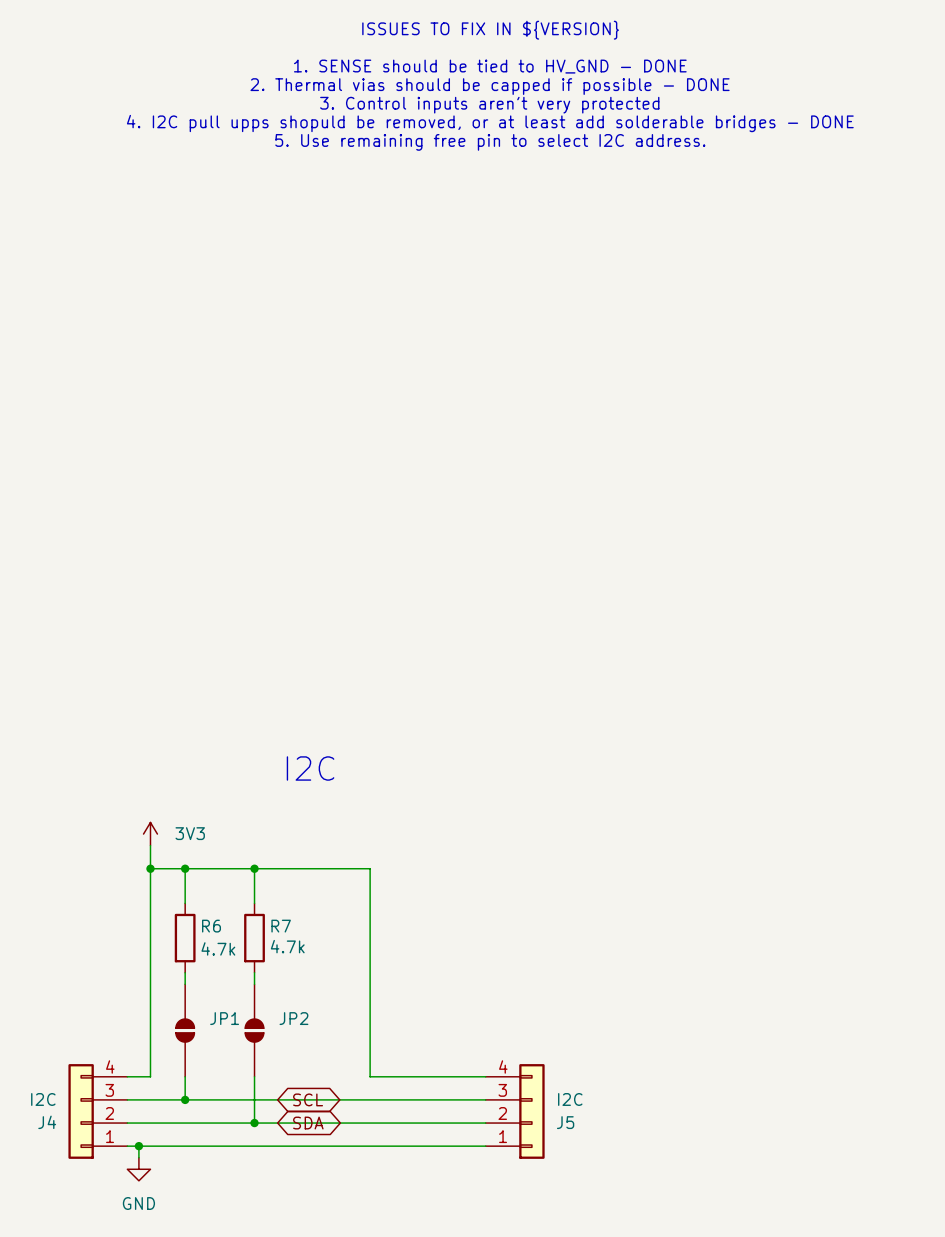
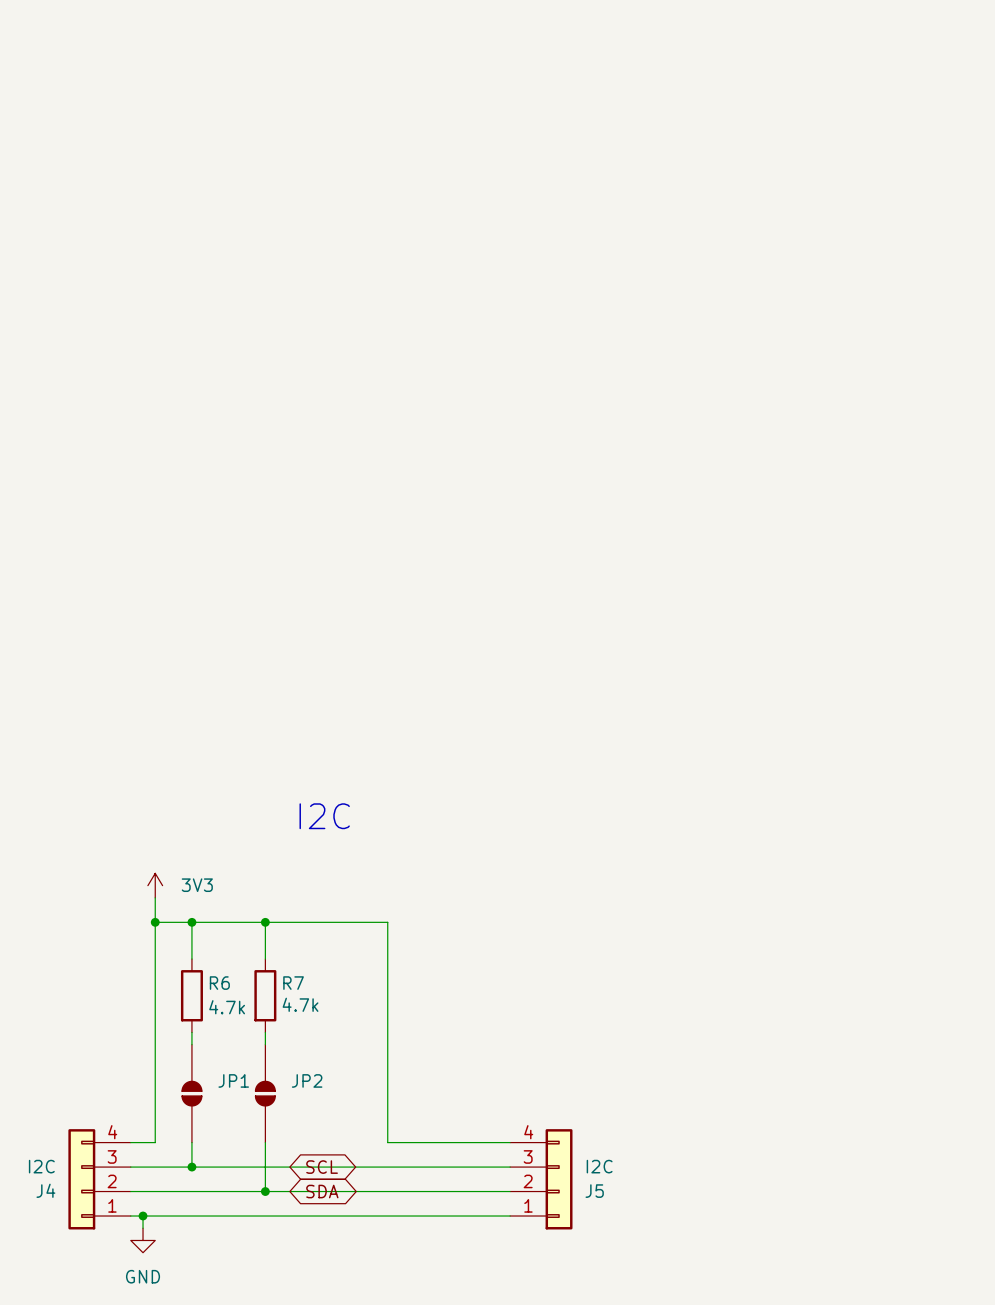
text: ISSUES TO FIX IN ${VERSION} (490, 30) -> none
text: 1. SENSE should be tied to HV_GND - DONE (490, 66) -> none
text: 2. Thermal vias should be capped if possible - DONE (490, 86) -> none
text: 3. Control inputs aren't very protected (489, 105) -> none
text: 4. I2C pull upps shopuld be removed, or at least add solderable bridges - DONE (490, 123) -> none
text: 5. Use remaining free pin to select I2C address. (490, 142) -> none

